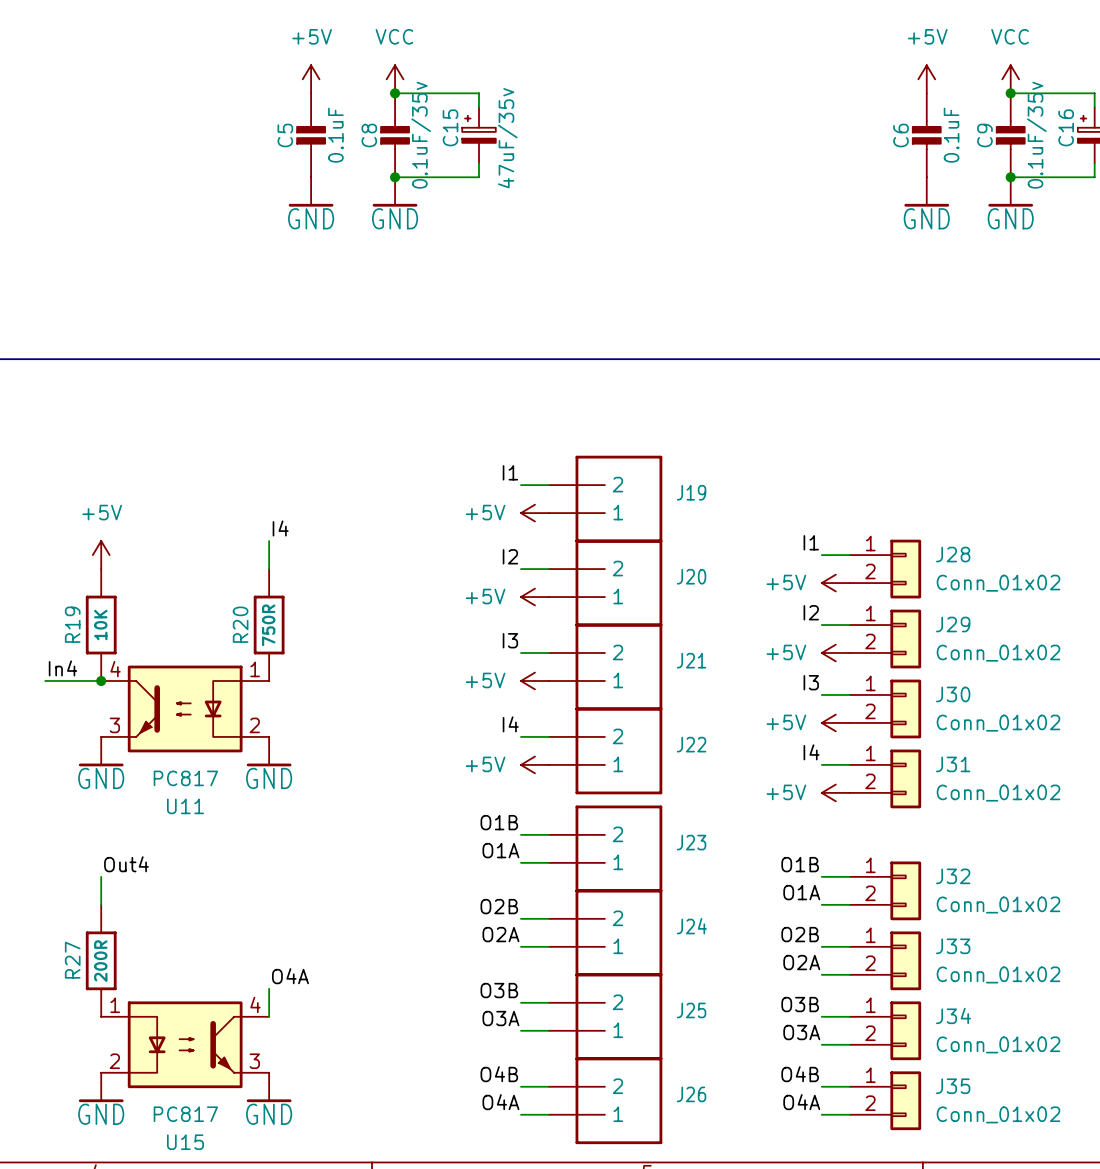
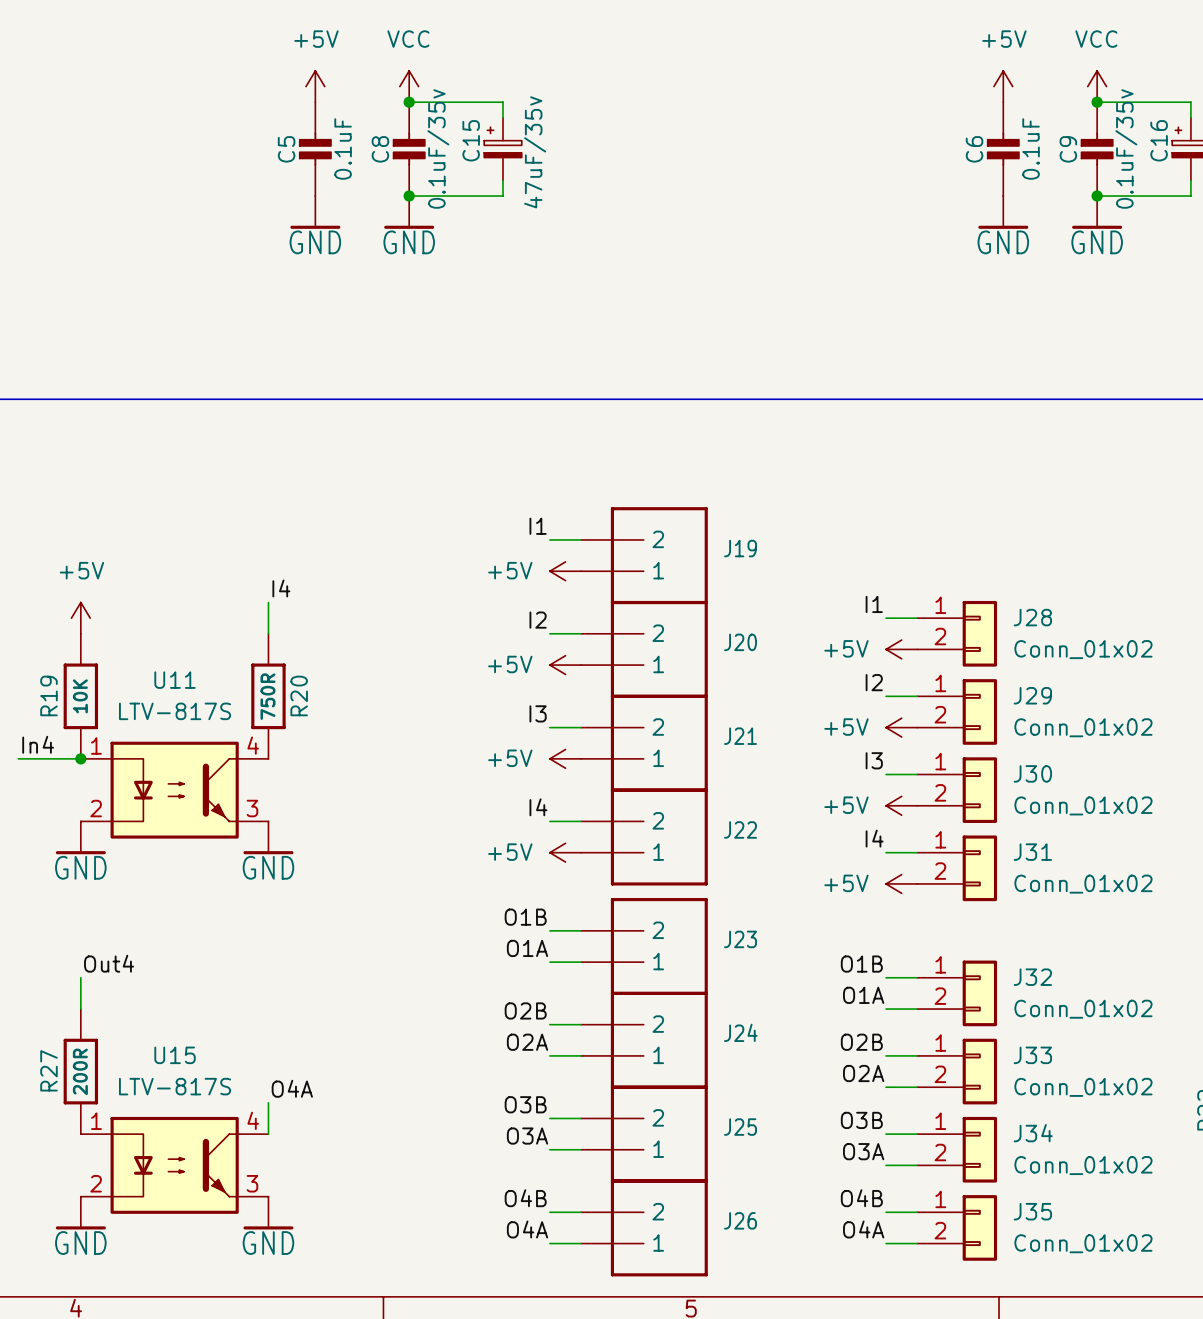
R20 name position: R20 (240, 624) -> R20 (299, 695)
U11 symbol: [101, 665, 270, 753] -> [80, 741, 269, 839]
U11 value: PC817 (185, 778) -> LTV-817S (175, 711)
U11 name position: U11 (185, 806) -> U11 (175, 680)
U15 value: PC817 (185, 1114) -> LTV-817S (175, 1086)
U15 name position: U15 (185, 1142) -> U15 (175, 1055)

